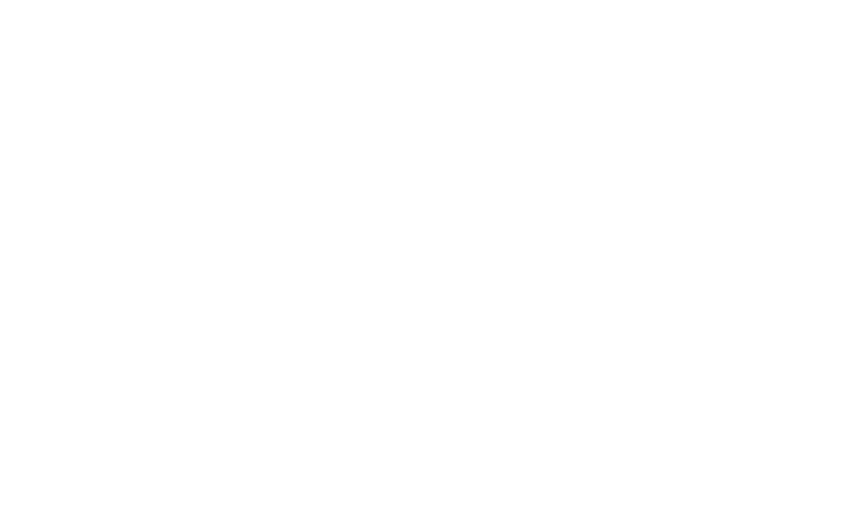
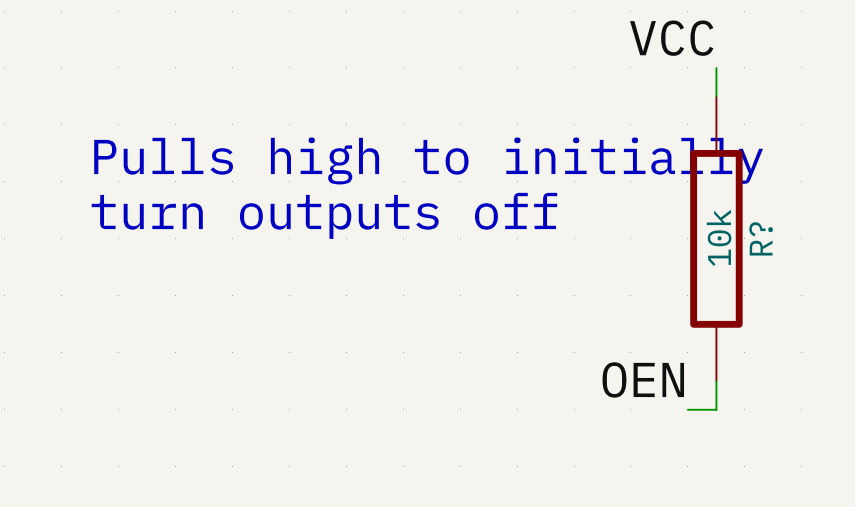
label: none -> VCC (671, 38)
wire: none -> (716, 67) (716, 96)
text: none -> Pulls high to initially (428, 160)
text: none -> turn outputs off (324, 215)
R?: none -> 10k (716, 238)
label: none -> OEN (643, 379)
wire: none -> (716, 381) (716, 409) (687, 409)

